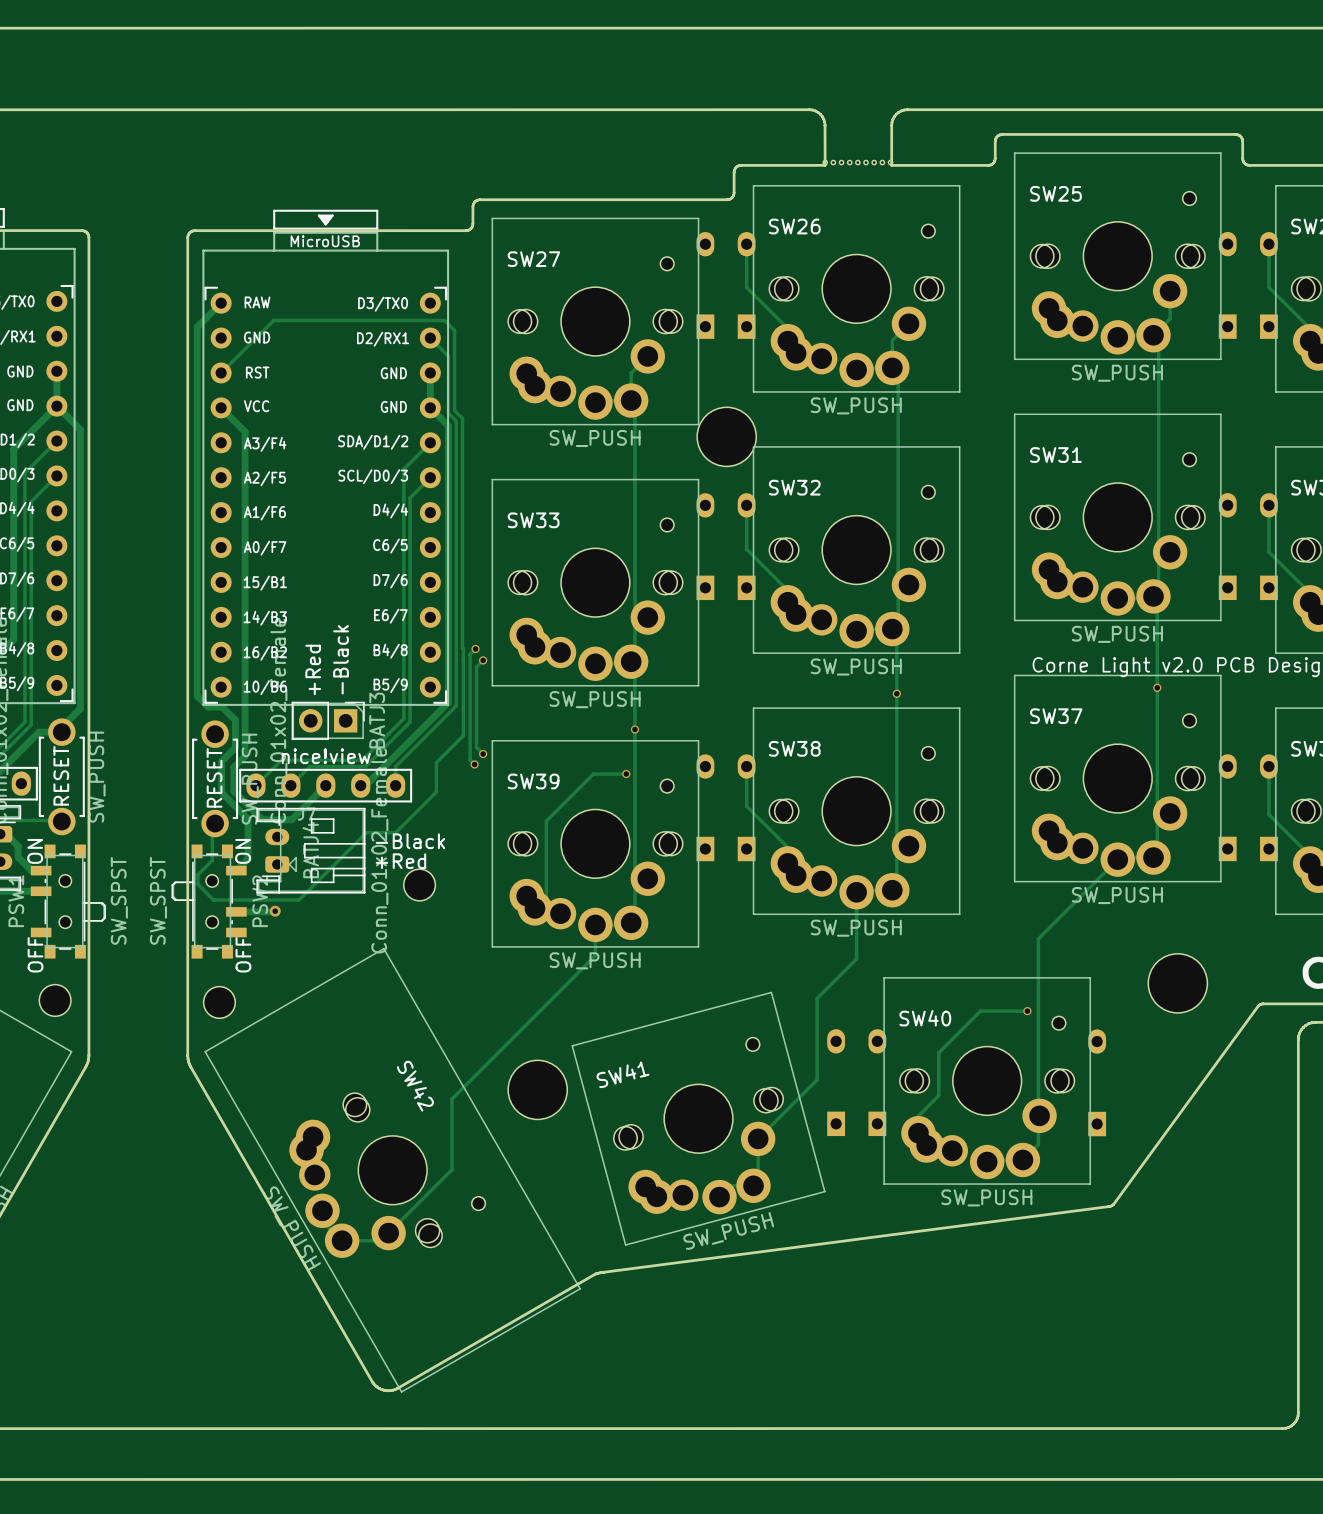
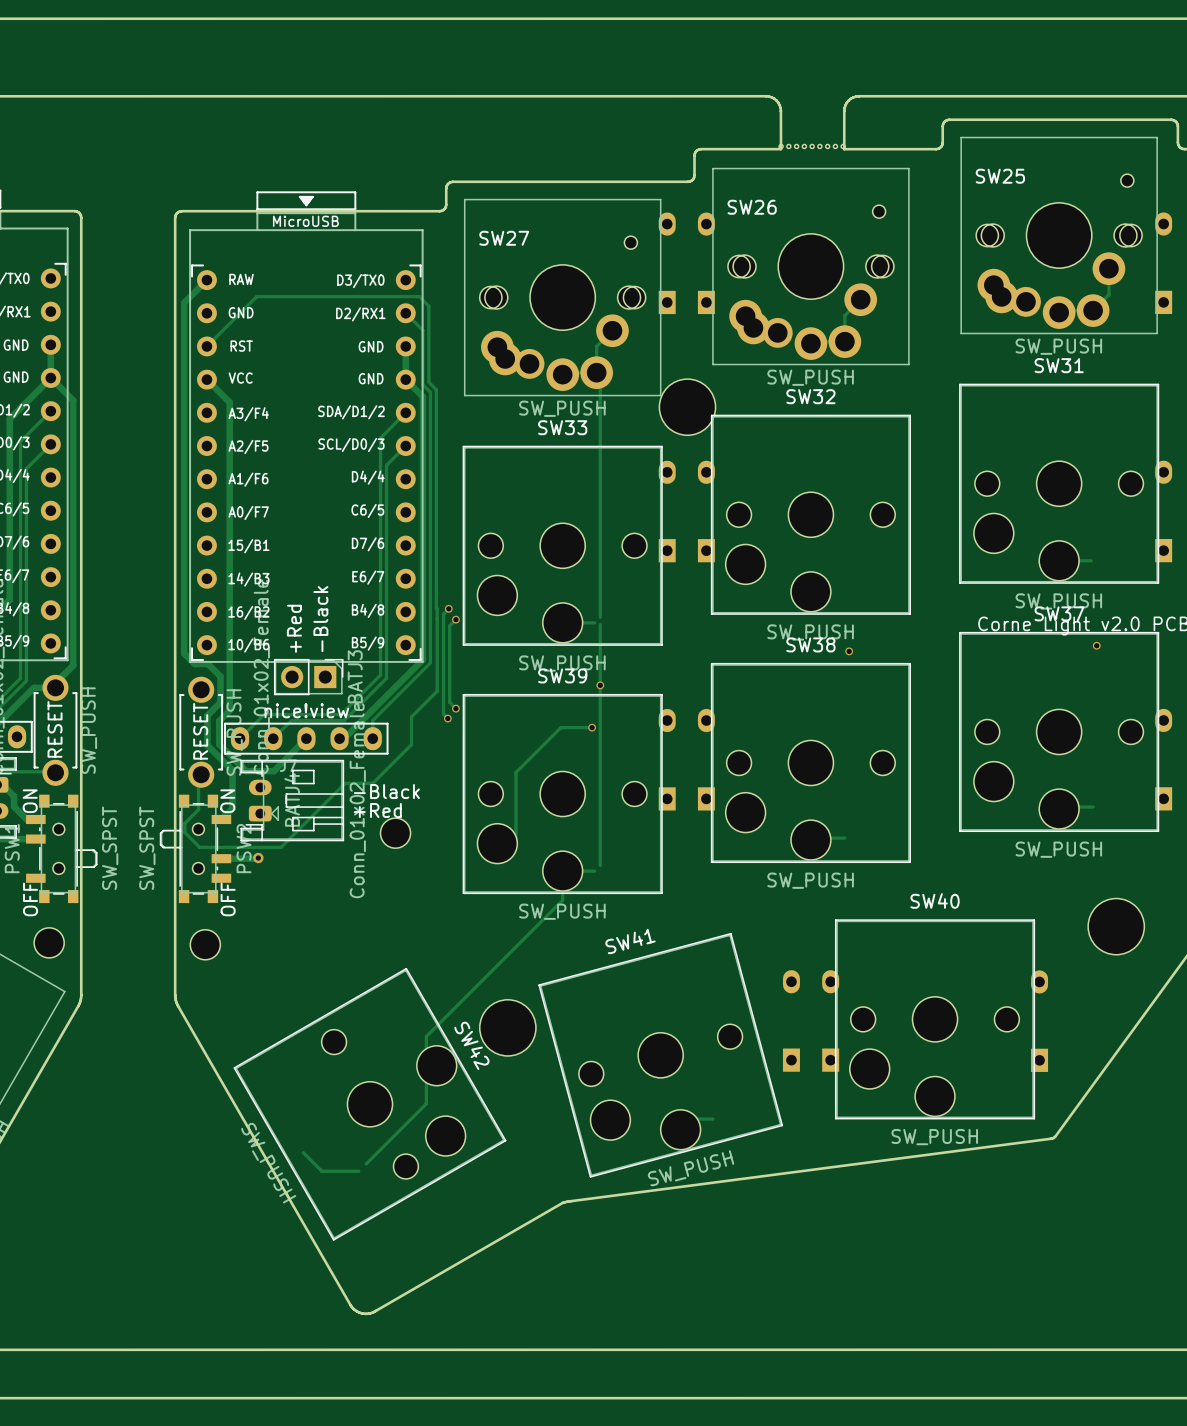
track: (746, 244) (746, 287) (787, 328) -> none
track: (1158, 340) (1158, 591) -> none
track: (898, 373) (898, 623) -> none
SW31 footprint: [1013, 413, 1222, 622] -> [959, 383, 1160, 584]
SW32 footprint: [752, 446, 961, 654] -> [710, 414, 912, 615]
SW31 name position: SW31 (1055, 455) -> SW31 (1059, 365)
SW33 footprint: [491, 478, 700, 687] -> [462, 445, 663, 646]
SW32 name position: SW32 (794, 487) -> SW32 (810, 396)
track: (746, 505) (746, 549) (787, 590) -> none
SW33 name position: SW33 (533, 520) -> SW33 (562, 427)
track: (1157, 600) (1157, 853) -> none
track: (896, 633) (896, 885) -> none
SW37 footprint: [1013, 674, 1222, 883] -> [959, 631, 1160, 833]
SW38 footprint: [752, 707, 961, 915] -> [710, 662, 912, 864]
SW37 name position: SW37 (1056, 716) -> SW37 (1059, 613)
SW39 footprint: [491, 740, 700, 948] -> [462, 693, 663, 895]
SW38 name position: SW38 (794, 748) -> SW38 (810, 644)
track: (746, 766) (746, 806) (787, 847) (787, 863) -> none
SW39 name position: SW39 (533, 781) -> SW39 (562, 675)
track: (1117, 859) (1038, 938) (1038, 1144) (1022, 1159) (989, 1159) -> none
track: (856, 892) (856, 958) (817, 998) (817, 1079) (758, 1138) (758, 1181) -> none
SW42 footprint: [204, 947, 581, 1393] -> [233, 967, 507, 1241]
SW40 footprint: [883, 977, 1091, 1185] -> [834, 919, 1036, 1120]
SW41 footprint: [571, 991, 826, 1246] -> [538, 932, 784, 1178]
track: (1027, 1011) (980, 1011) (938, 1052) (938, 1095) (917, 1117) (917, 1134) -> none
via: (1027, 1011) -> none
SW40 name position: SW40 (925, 1018) -> SW40 (935, 900)
SW41 name position: SW41 (622, 1074) -> SW41 (630, 941)
SW42 name position: SW42 (415, 1086) -> SW42 (471, 1045)

